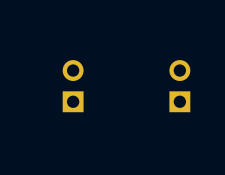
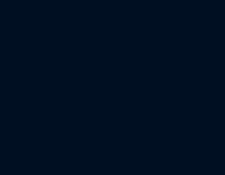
part: (73, 86) -> none
part: (179, 86) -> none

